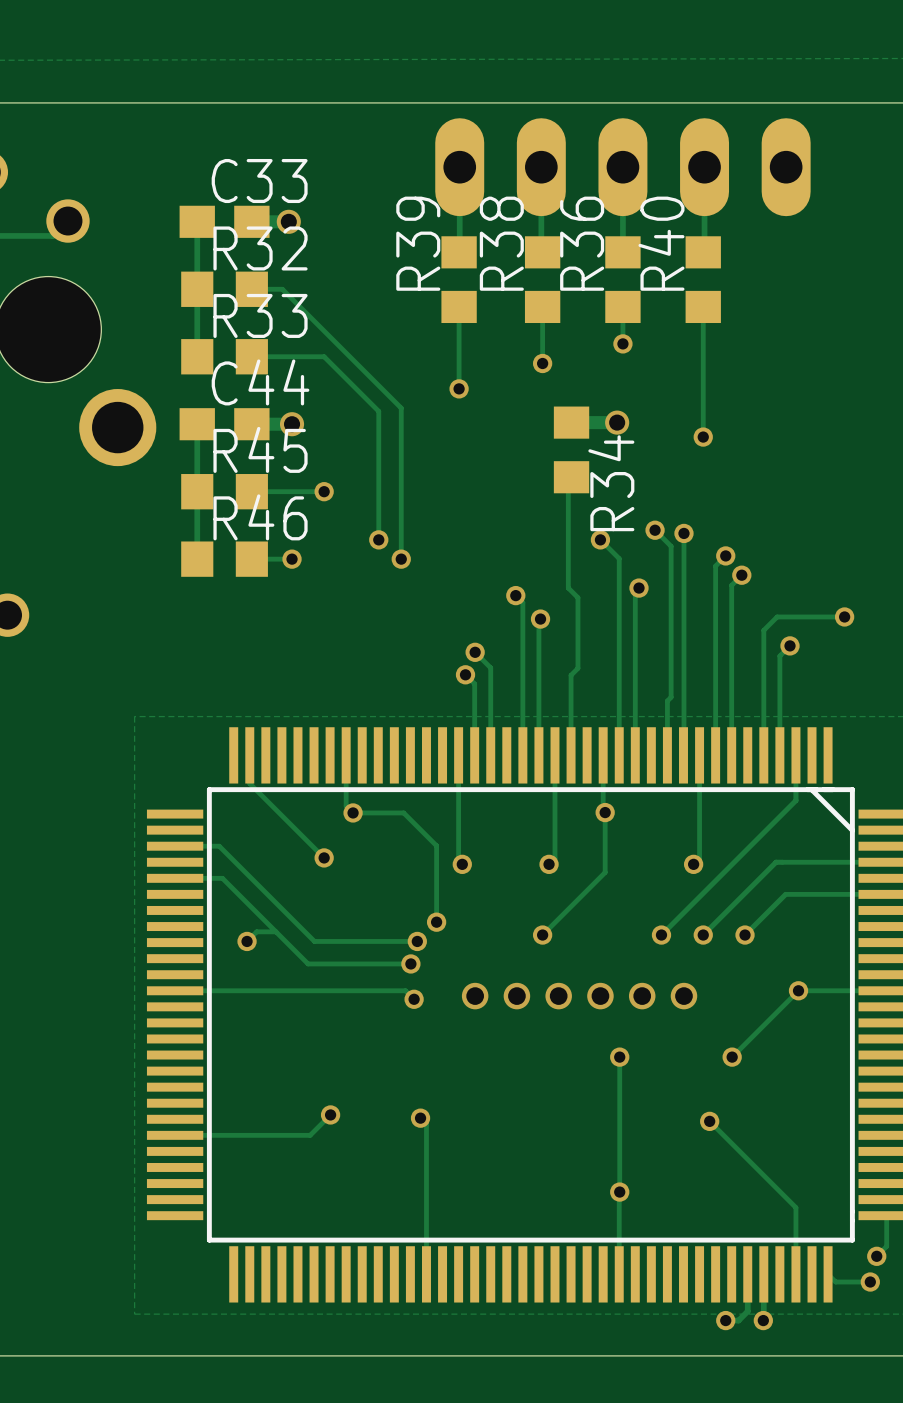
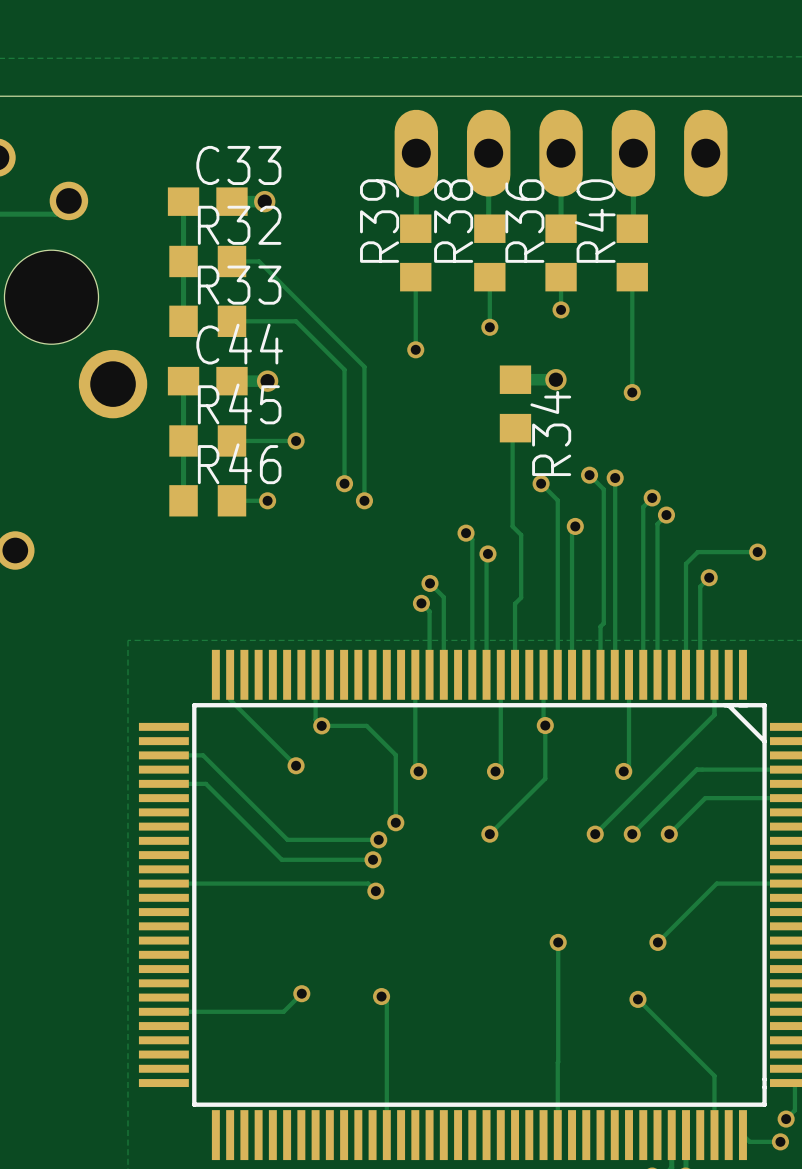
track: (275, 931) (256, 931) (247, 941) -> none
via: (247, 941) -> none
via: (798, 990) -> none
via: (475, 996) -> none
via: (516, 996) -> none
via: (558, 996) -> none
via: (600, 996) -> none
via: (642, 996) -> none
via: (683, 996) -> none
via: (619, 1192) -> none

